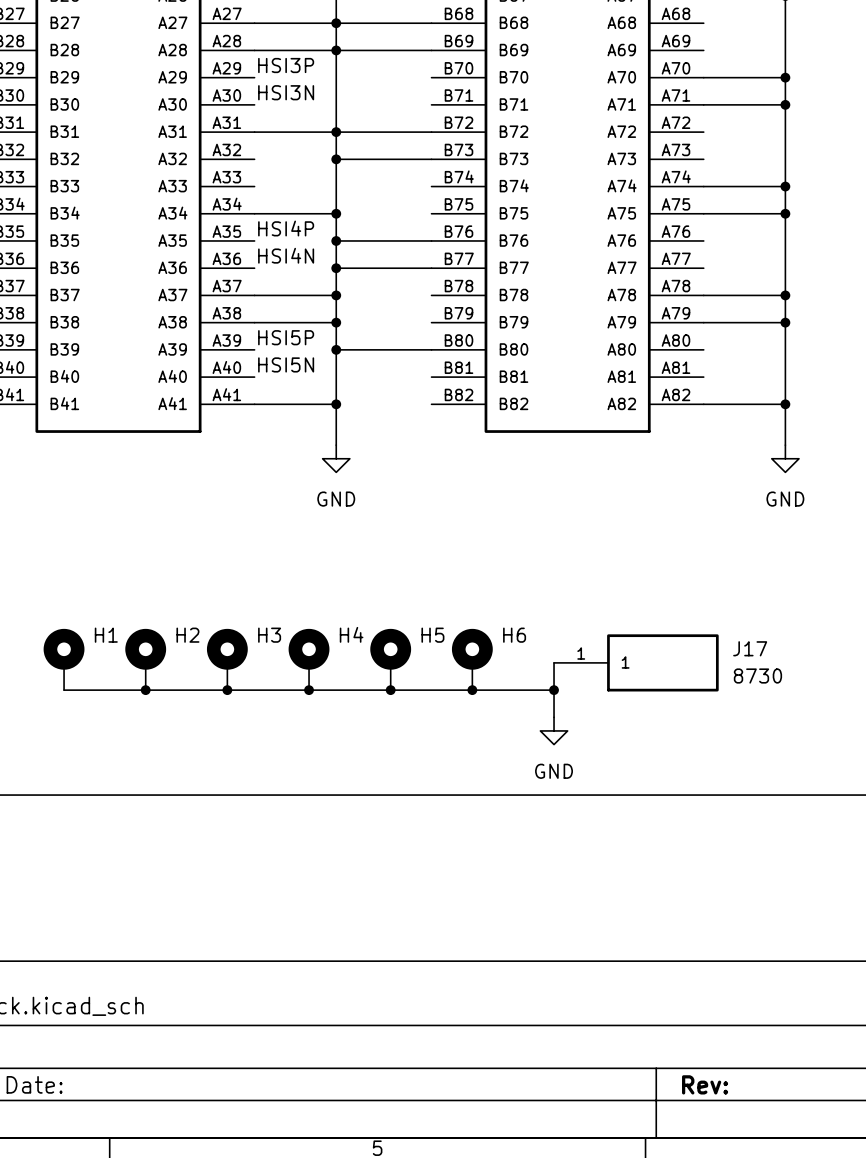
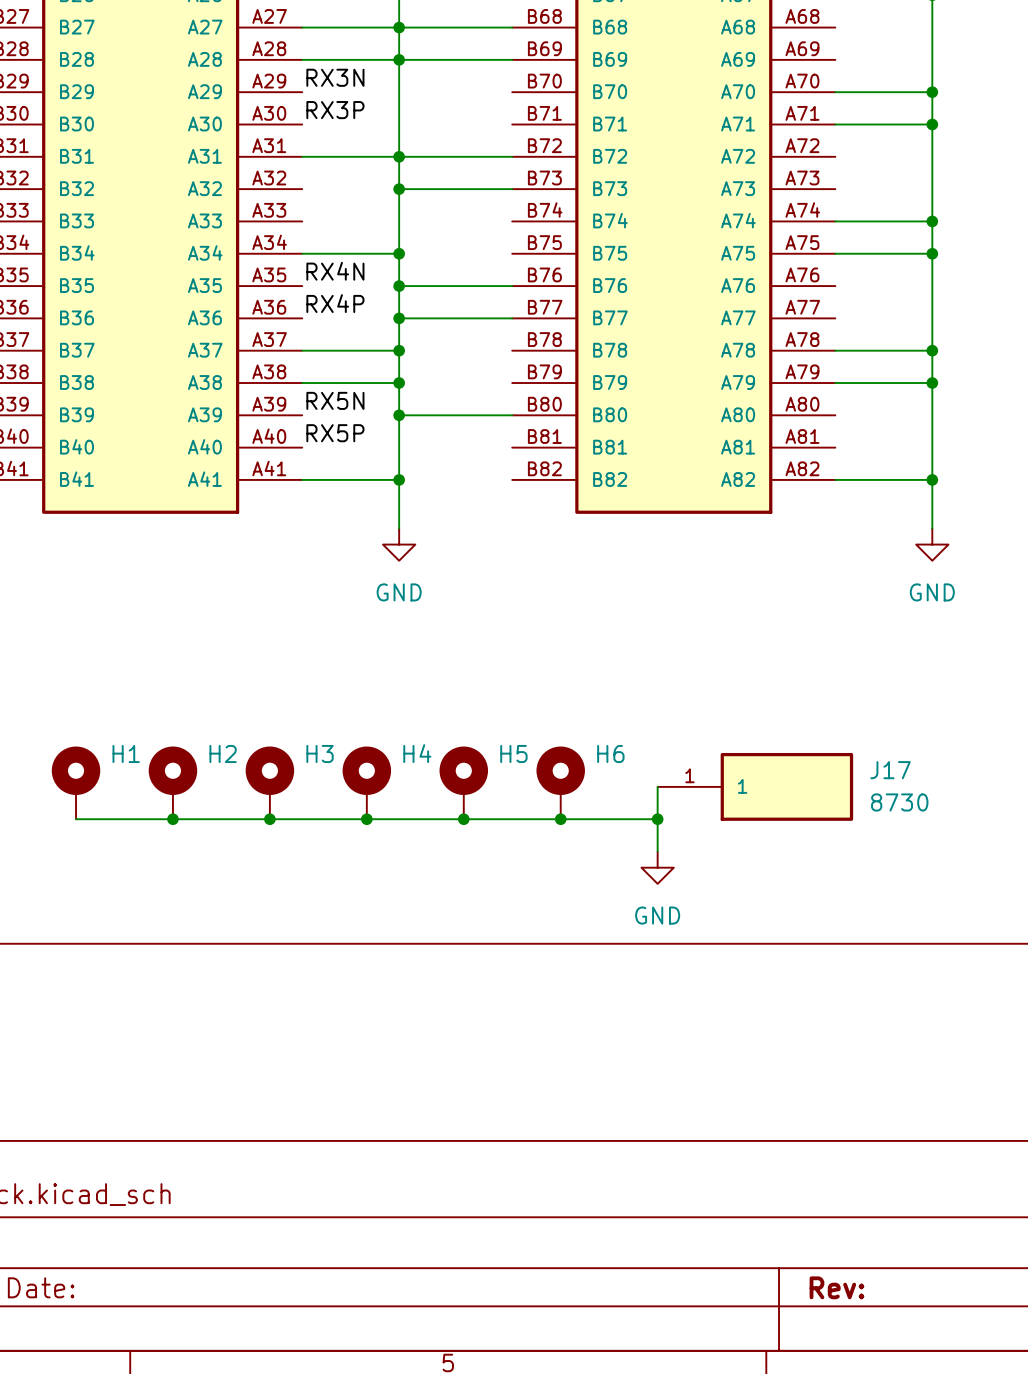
label: HSI3P (286, 65) -> RX3N (335, 77)
label: HSI3N (286, 92) -> RX3P (335, 110)
label: HSI4P (286, 228) -> RX4N (335, 271)
label: HSI4N (286, 255) -> RX4P (335, 303)
label: HSI5P (286, 337) -> RX5N (335, 400)
label: HSI5N (286, 364) -> RX5P (335, 433)

